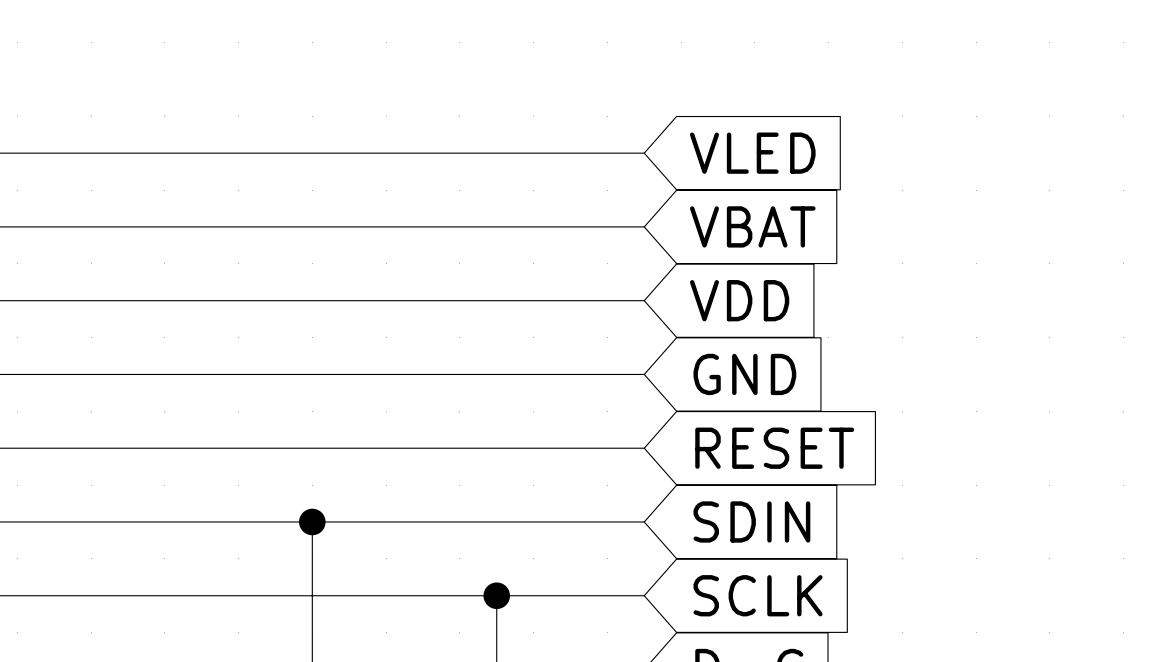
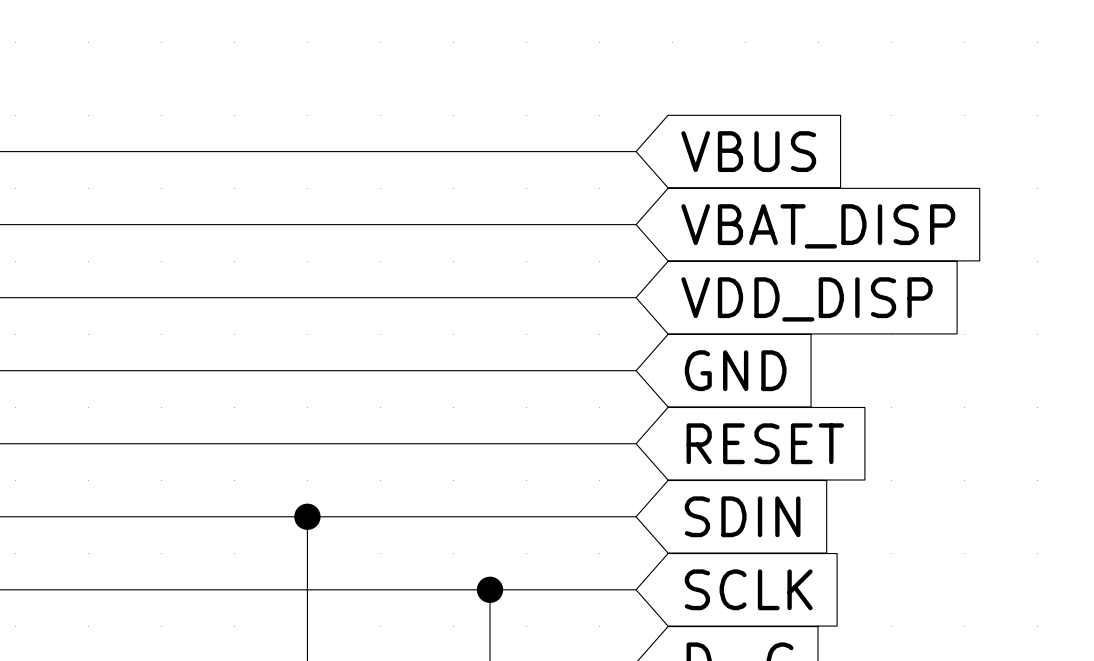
global label: VLED (752, 153) -> VBUS (748, 151)
global label: VBAT (752, 226) -> VBAT_DISP (818, 226)
global label: VDD (739, 300) -> VDD_DISP (806, 299)

